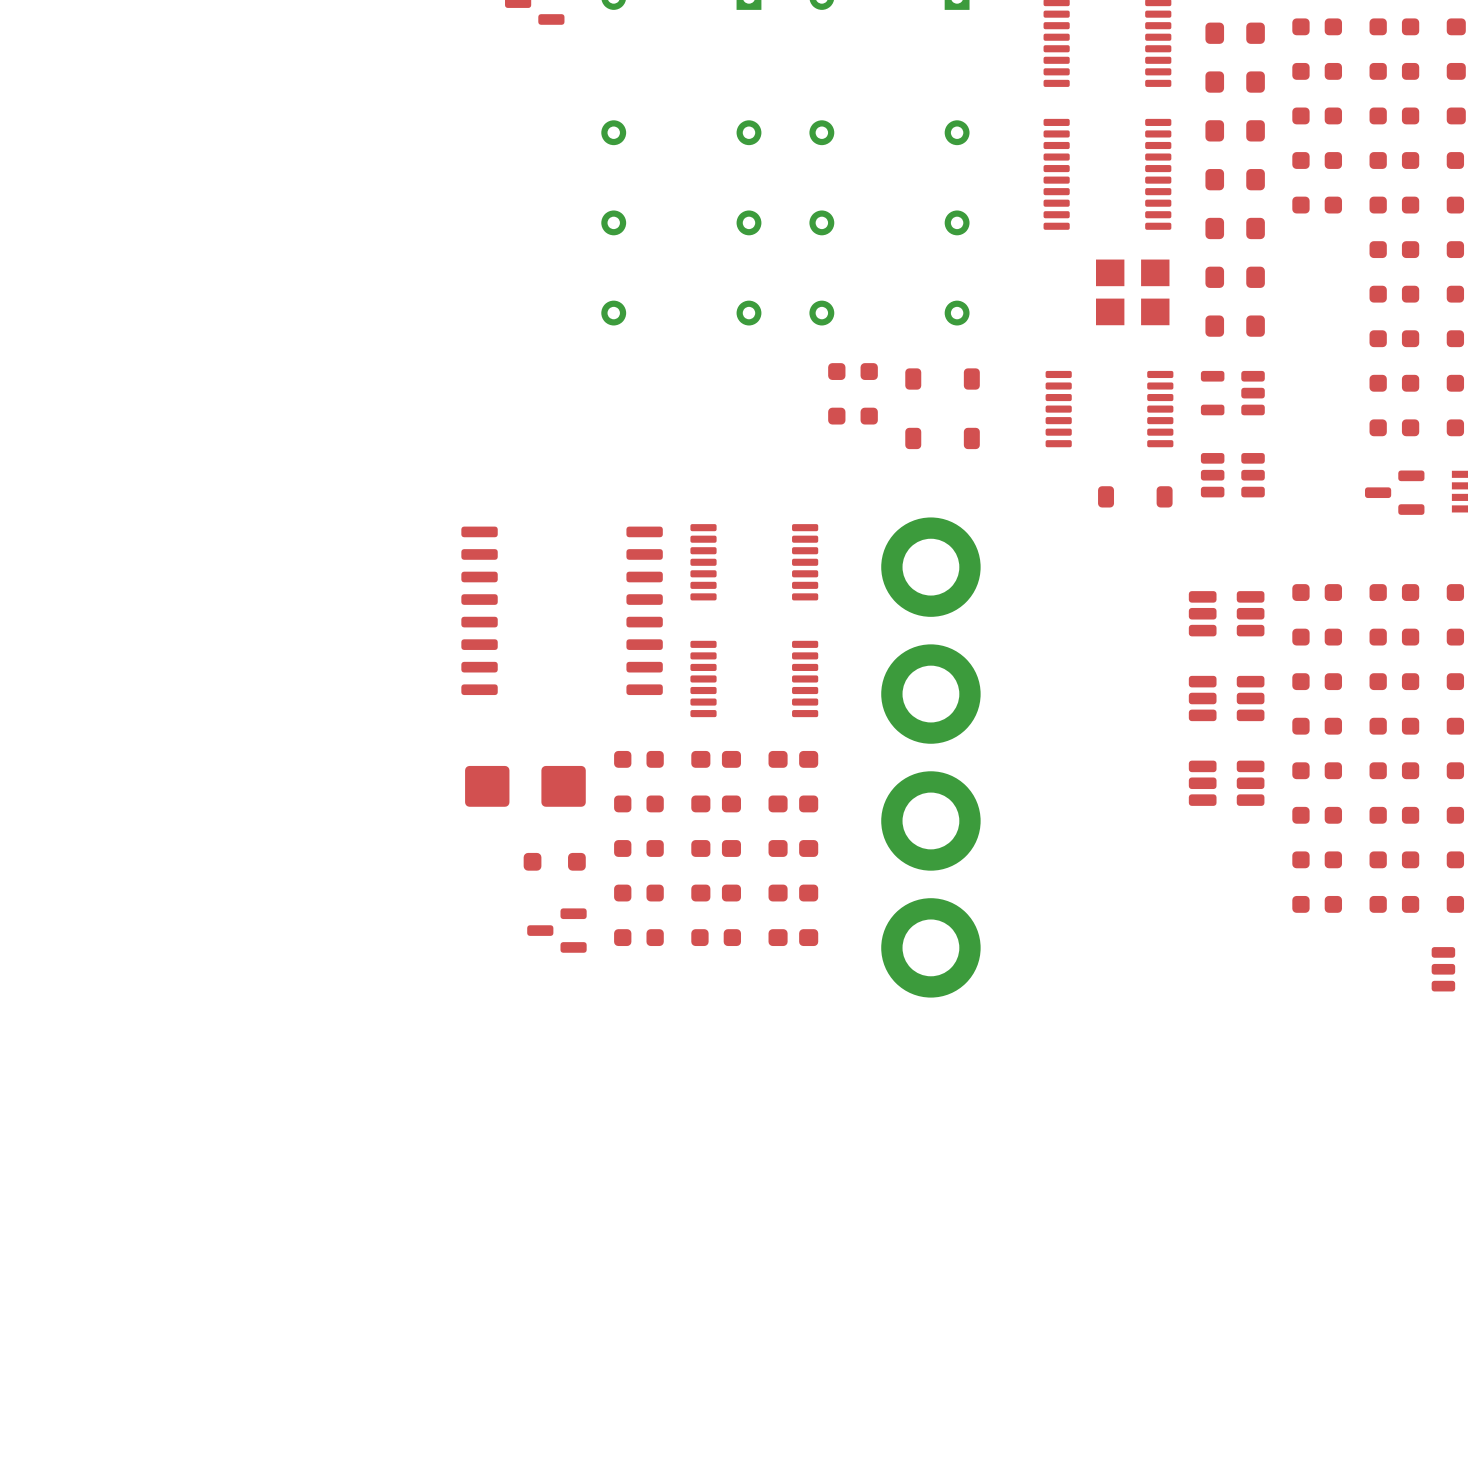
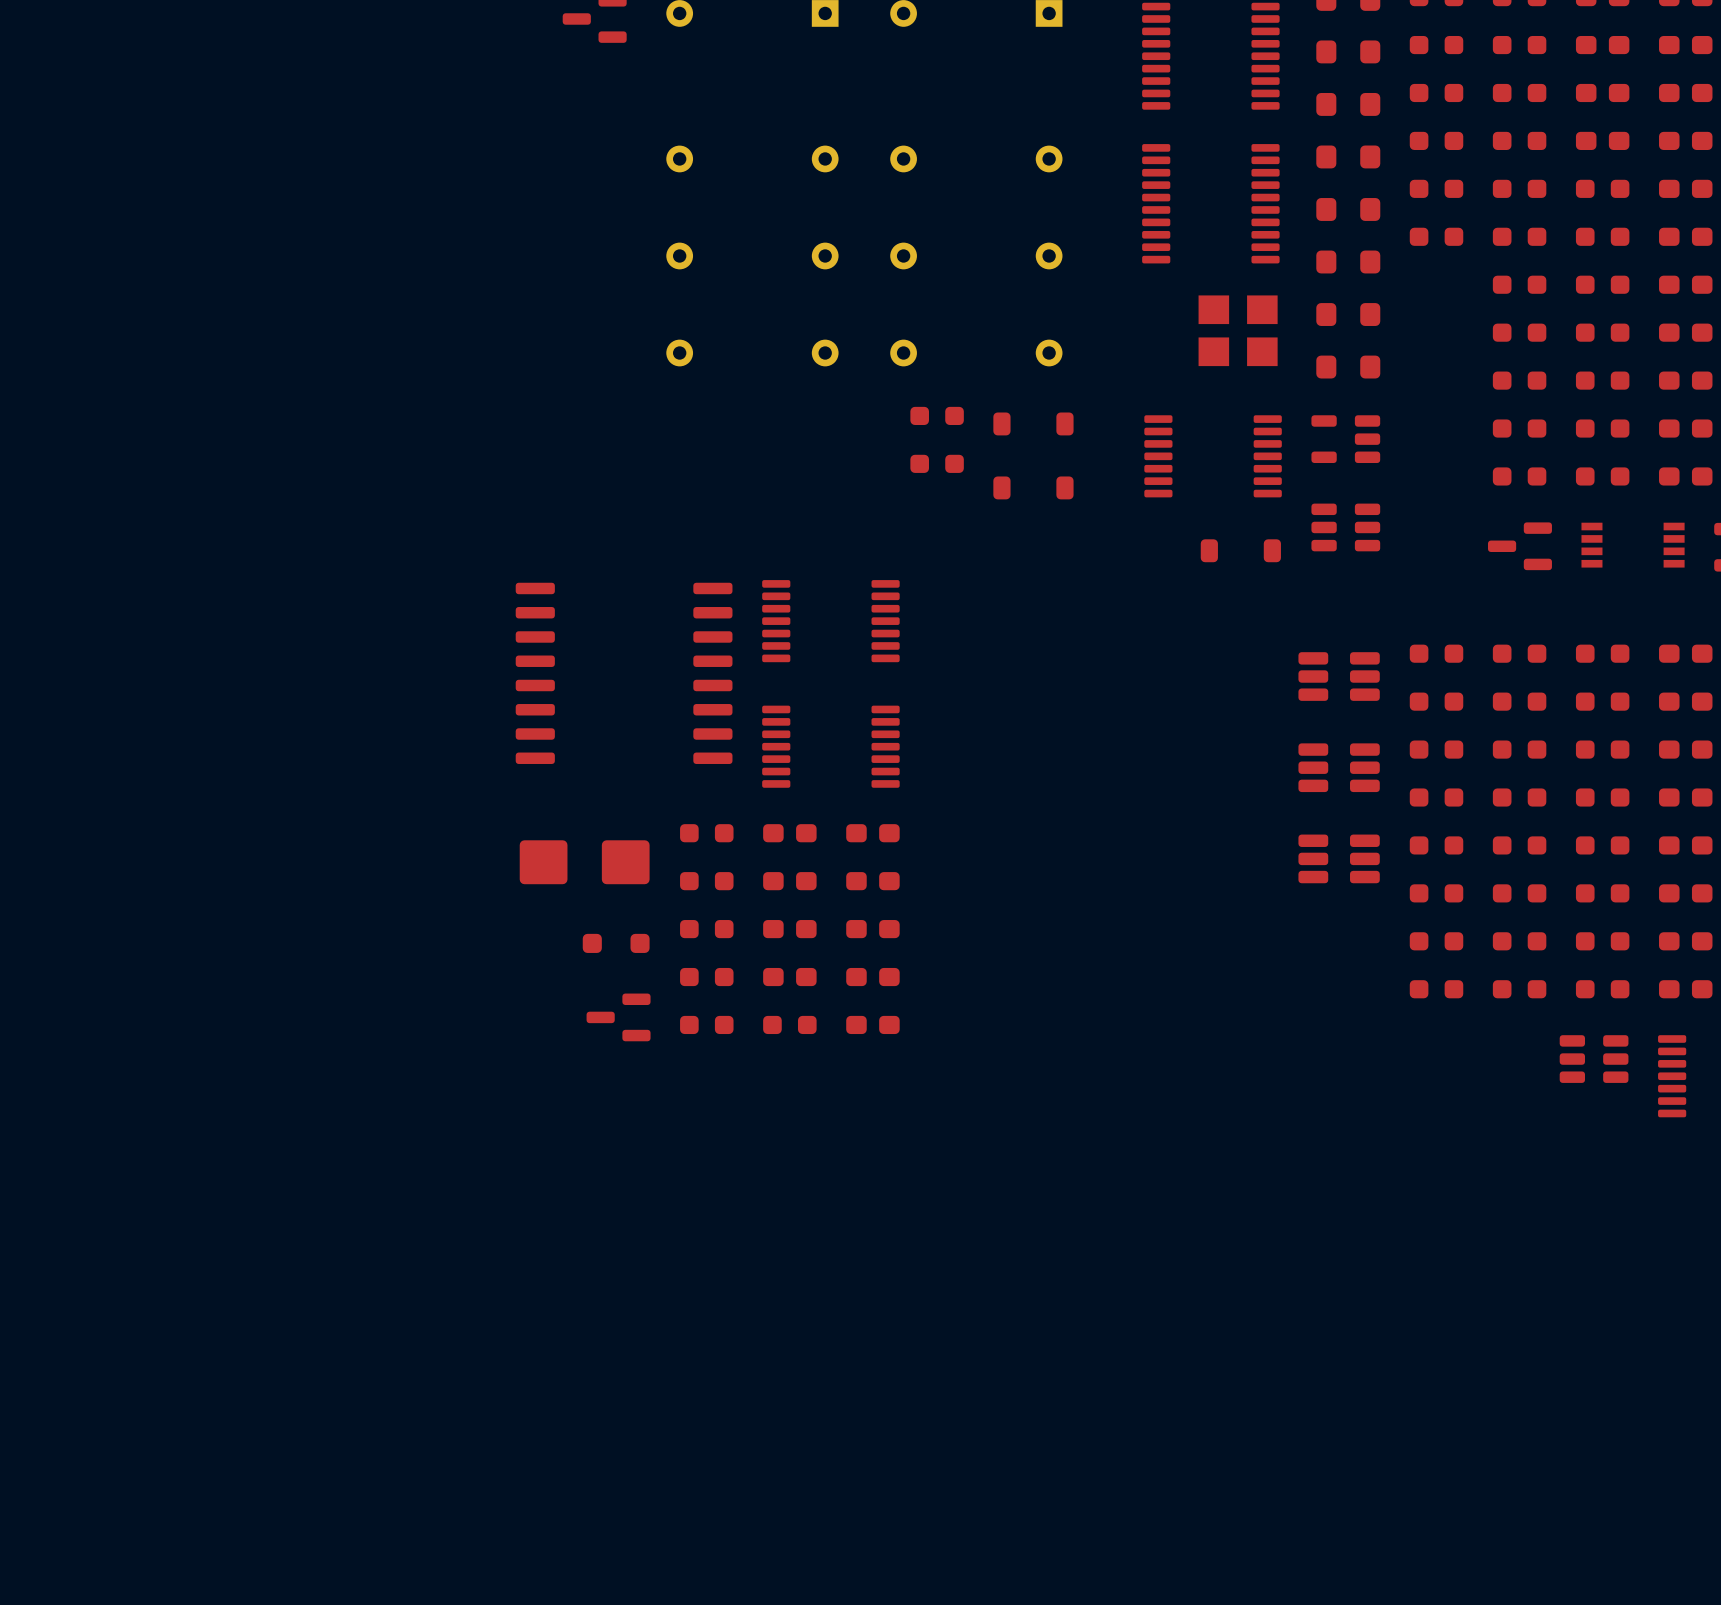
part: (930, 567) -> none
part: (930, 694) -> none
part: (930, 820) -> none
part: (930, 947) -> none

